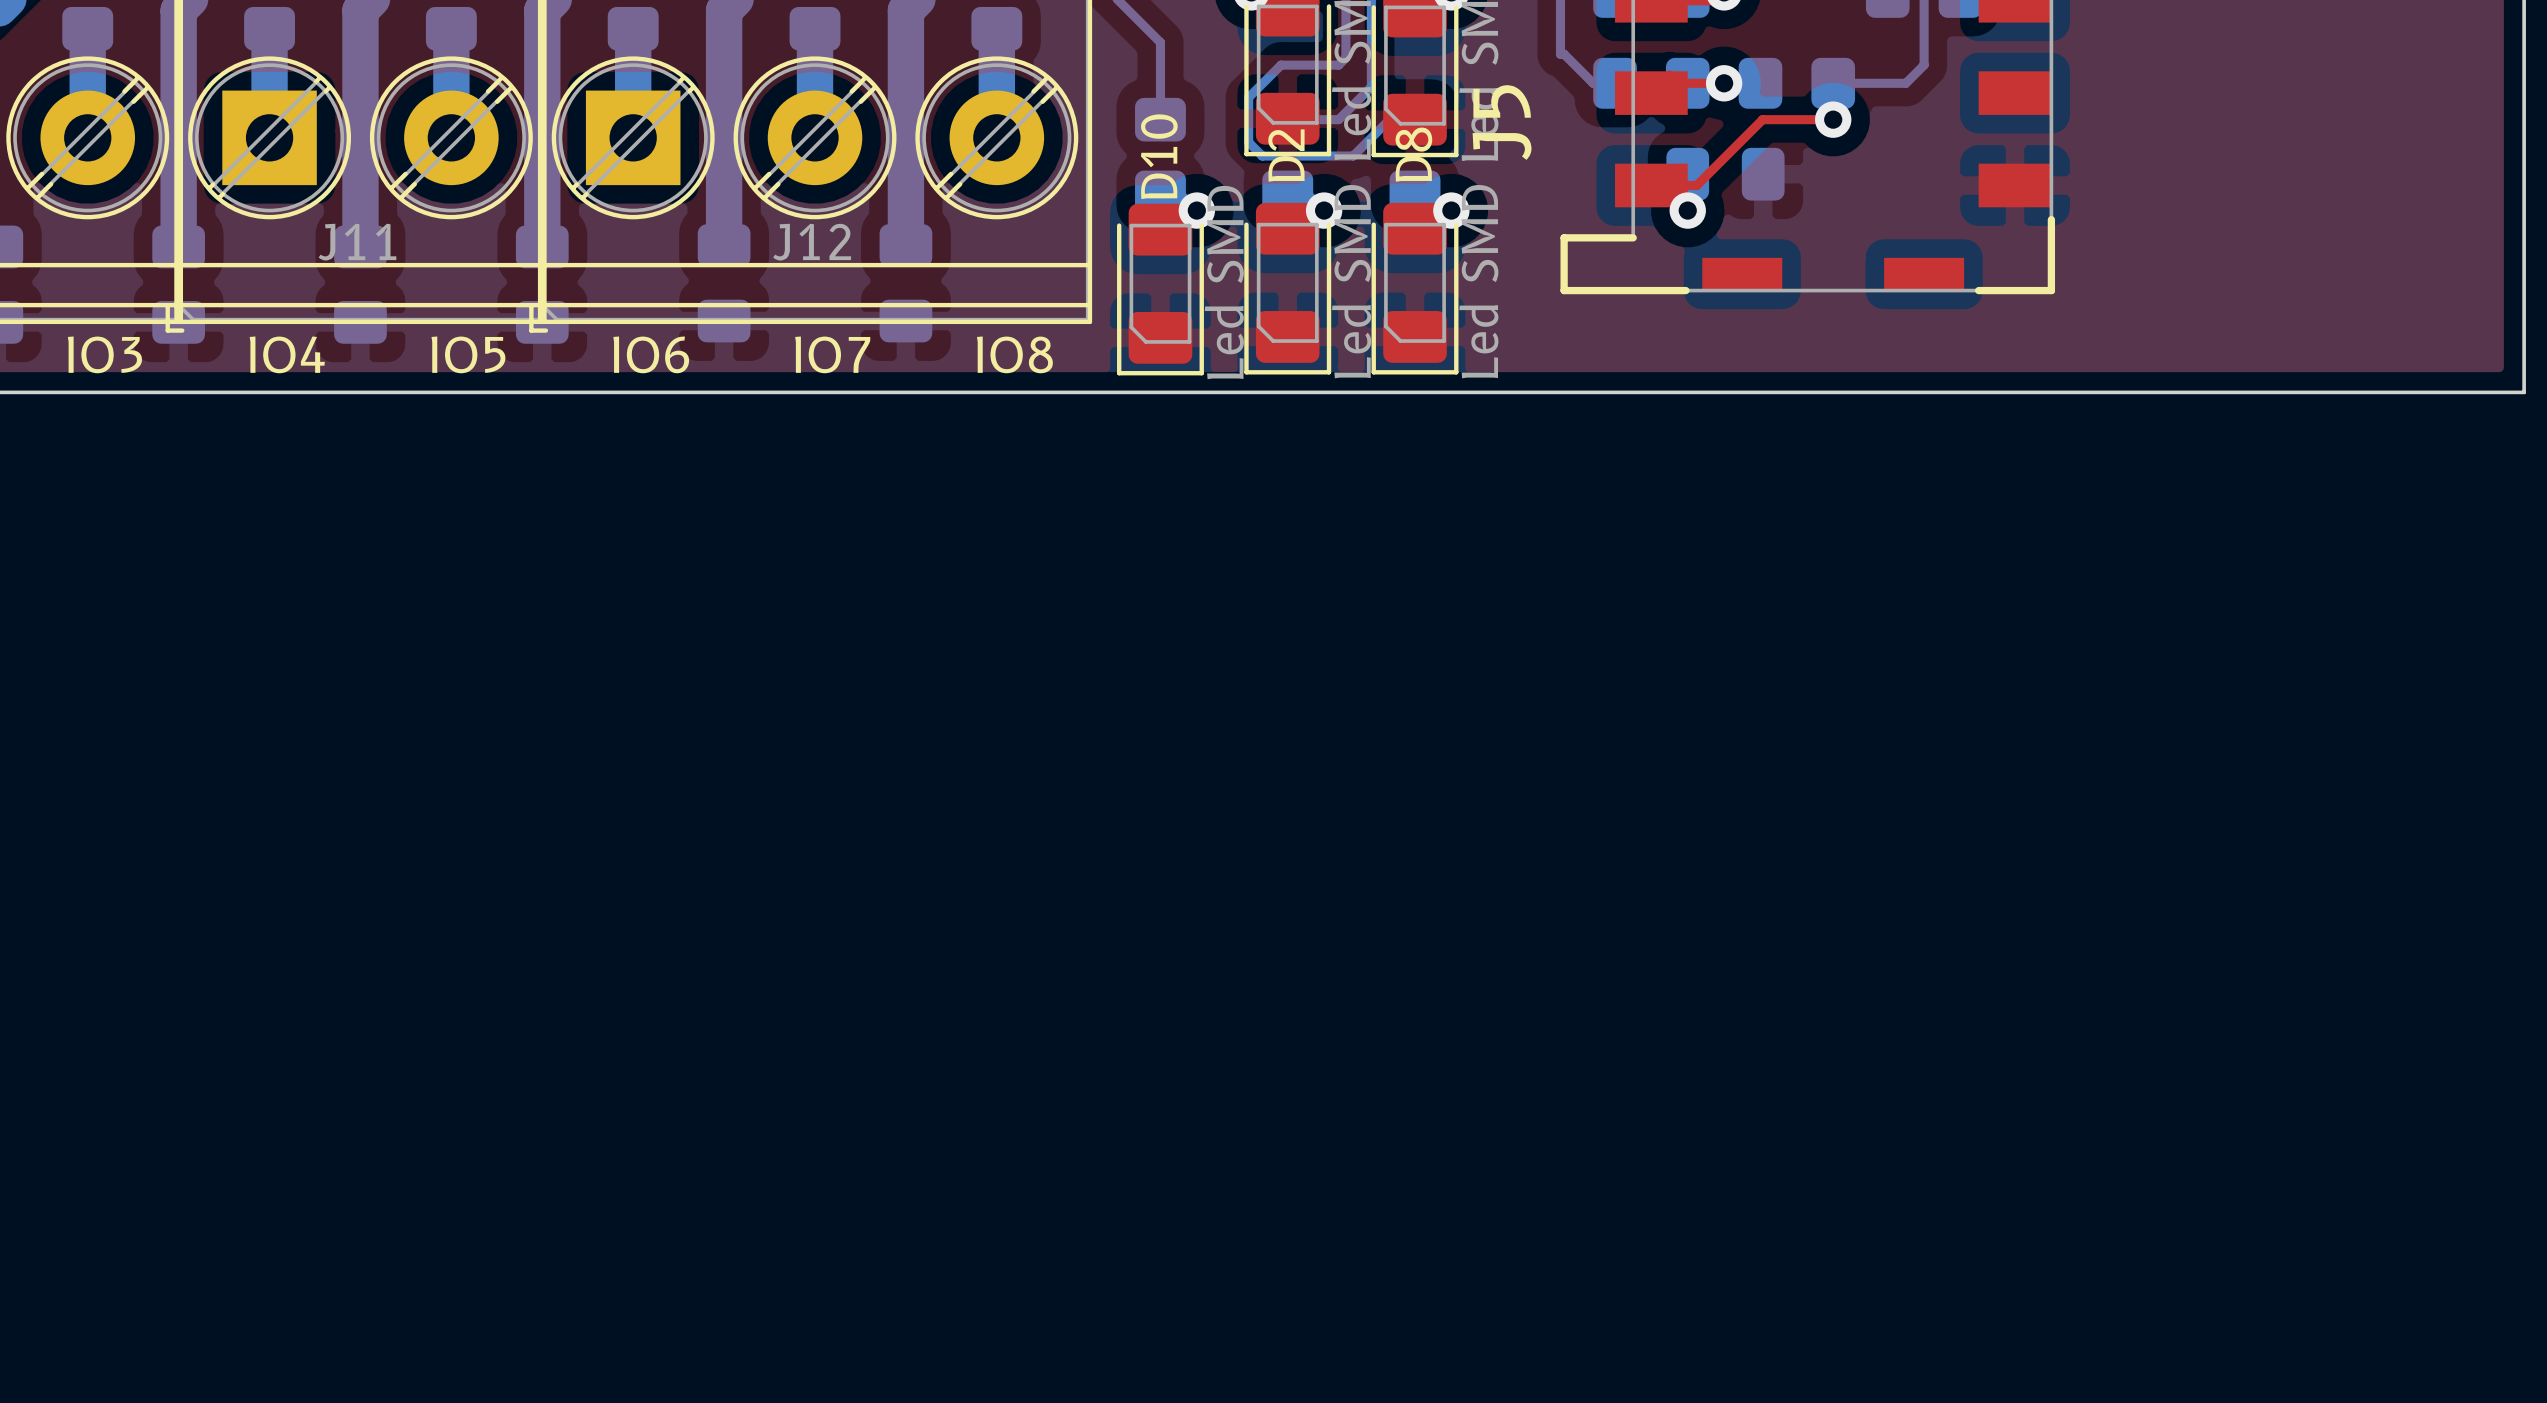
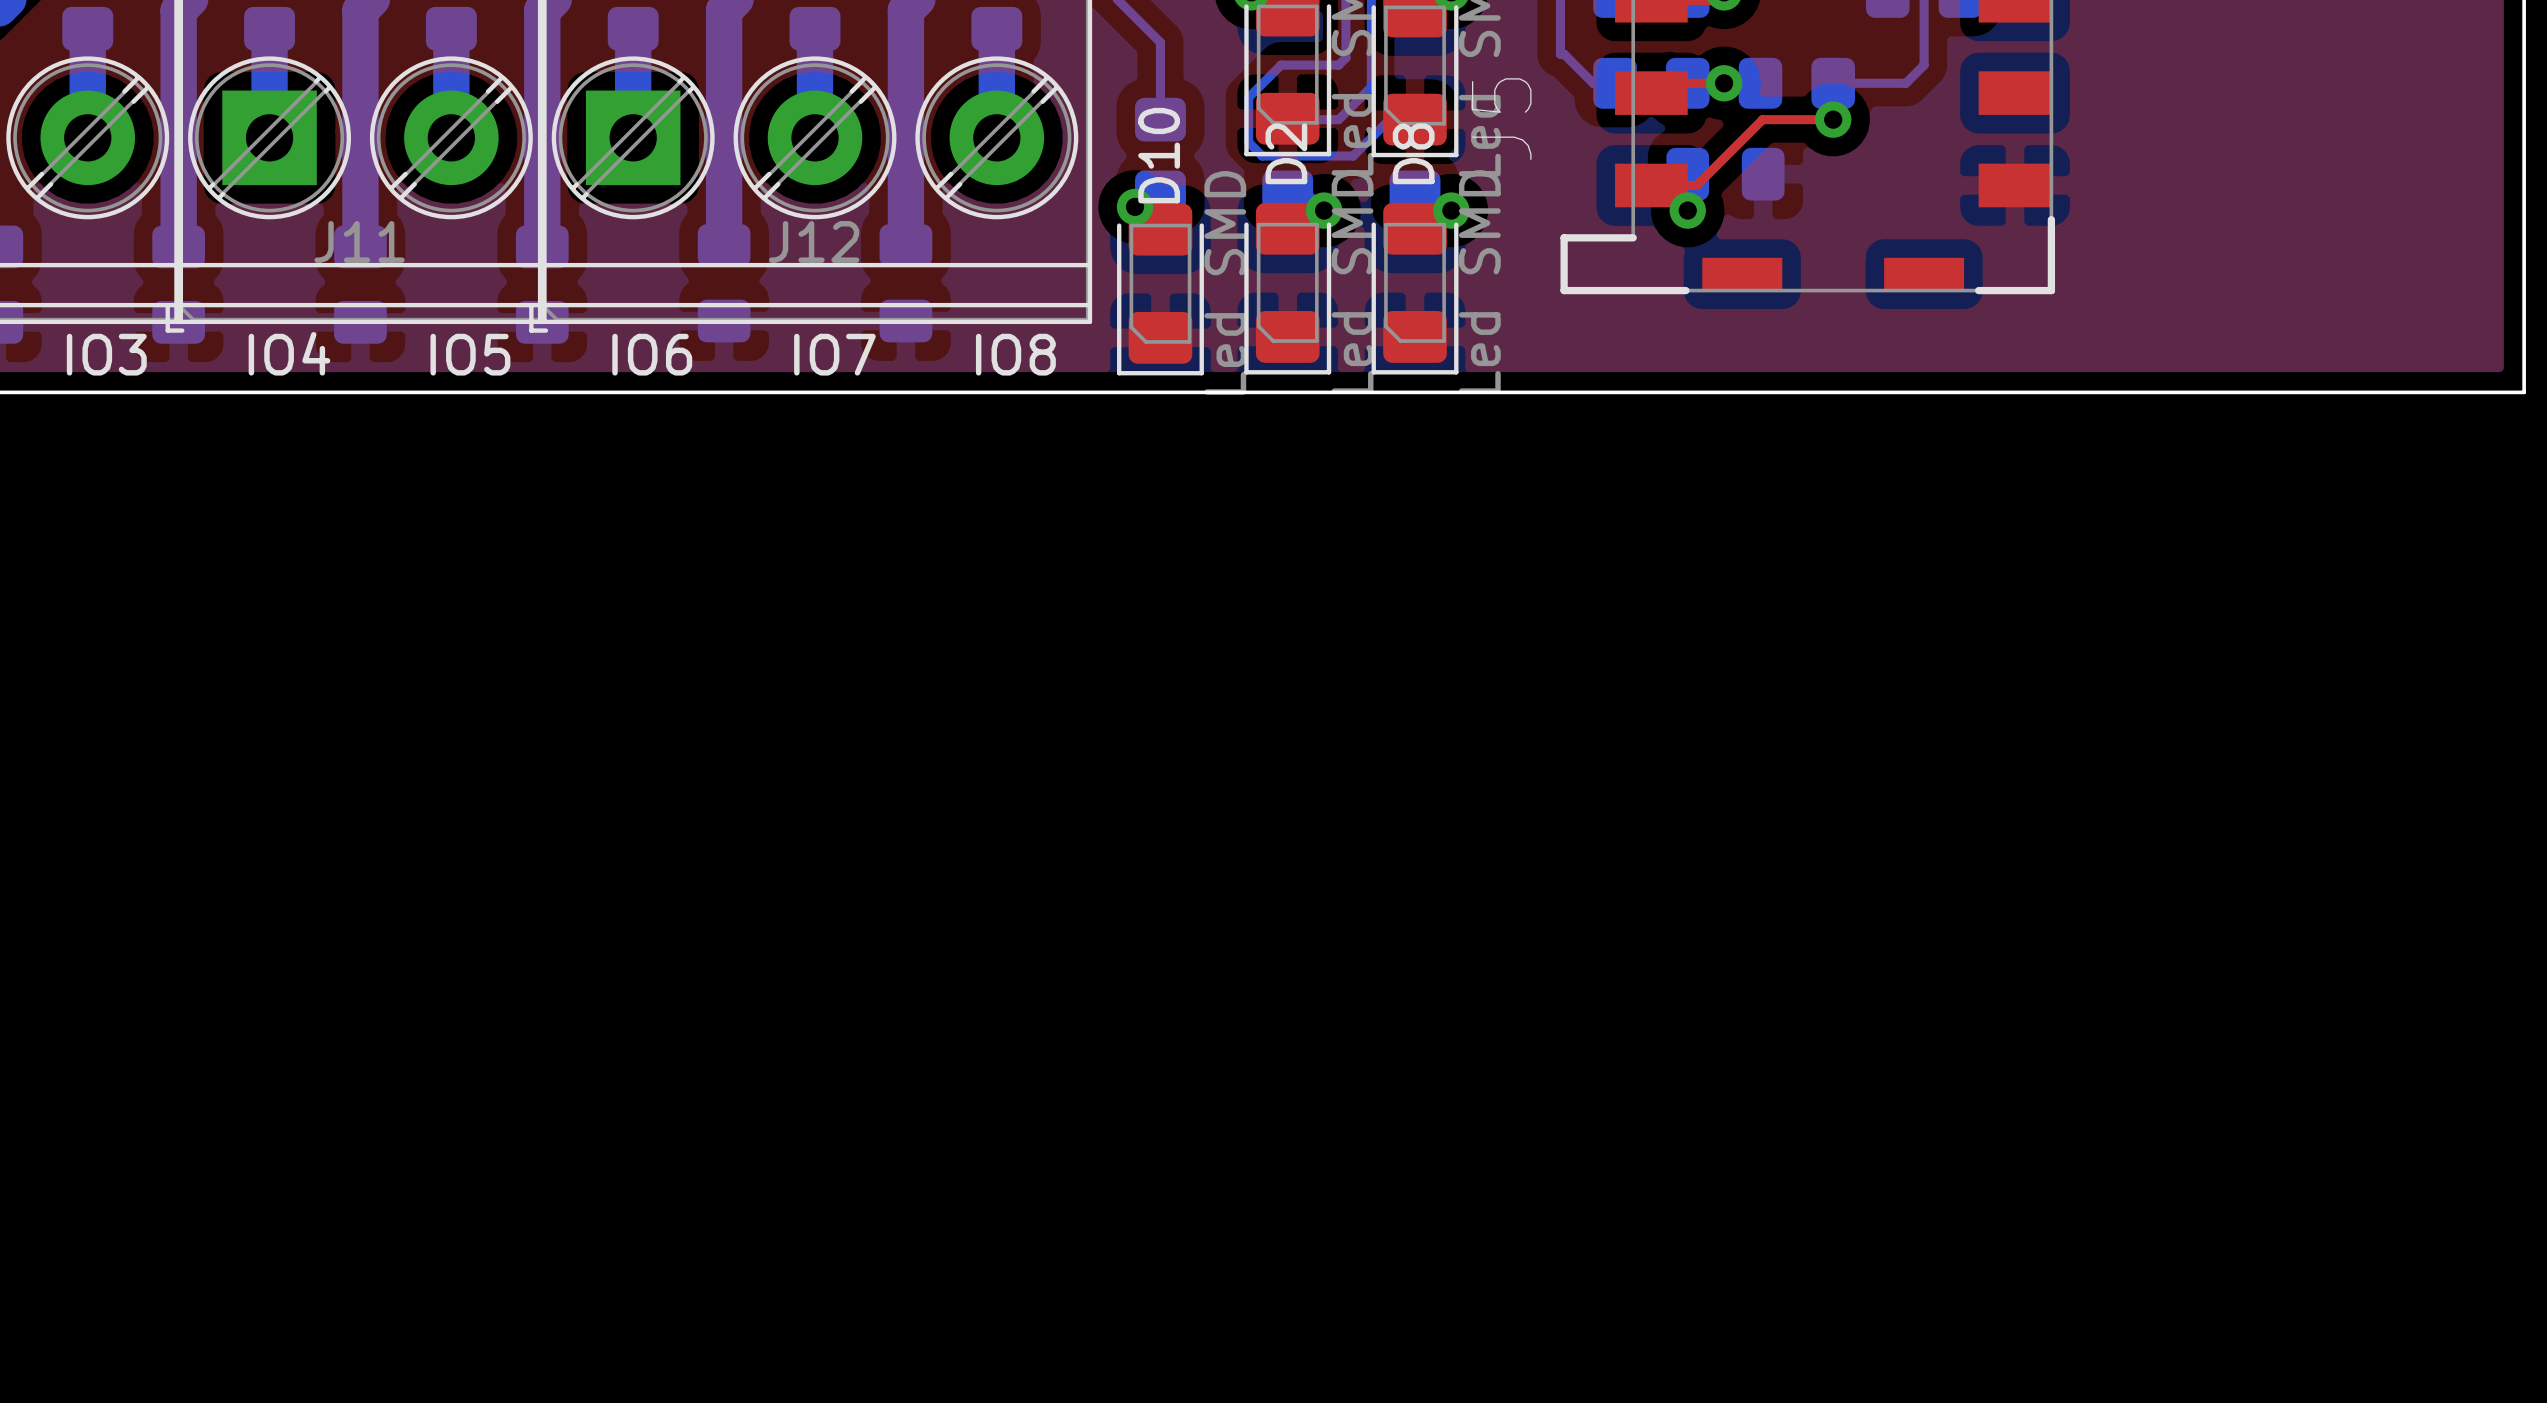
via position: (1196, 210) -> (1135, 206)

